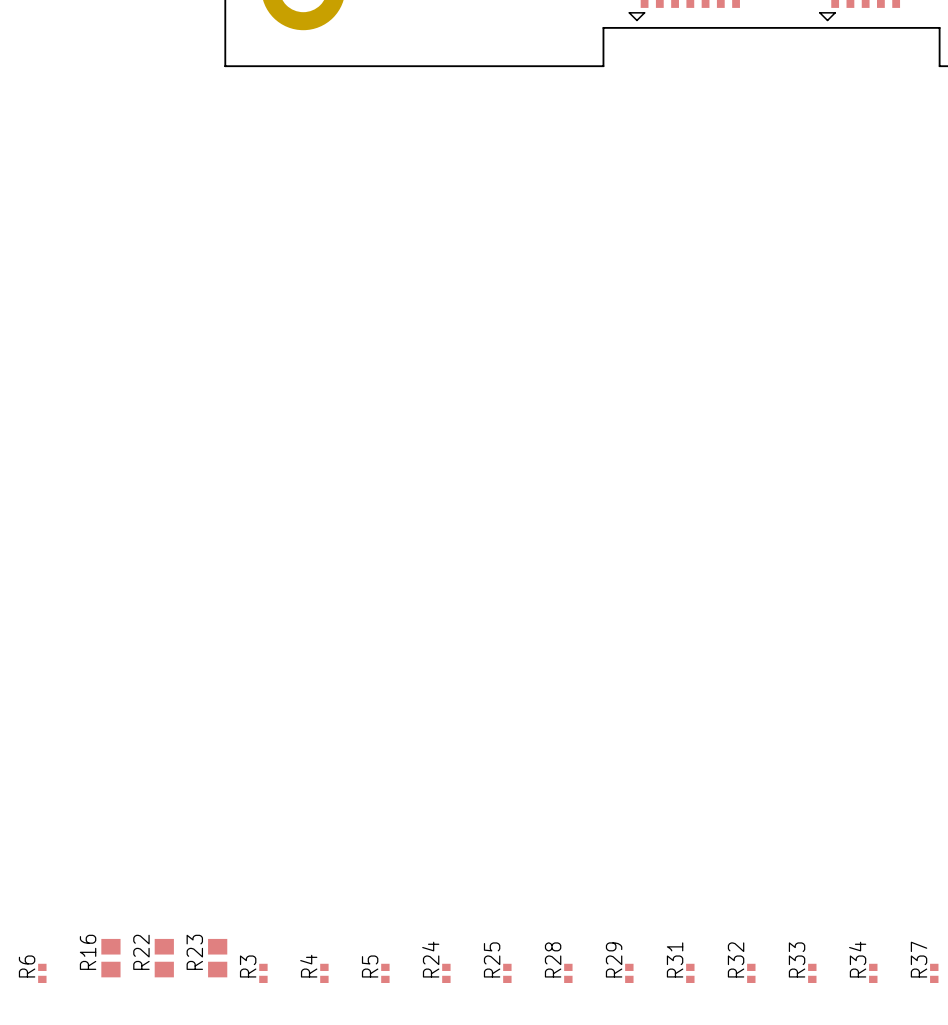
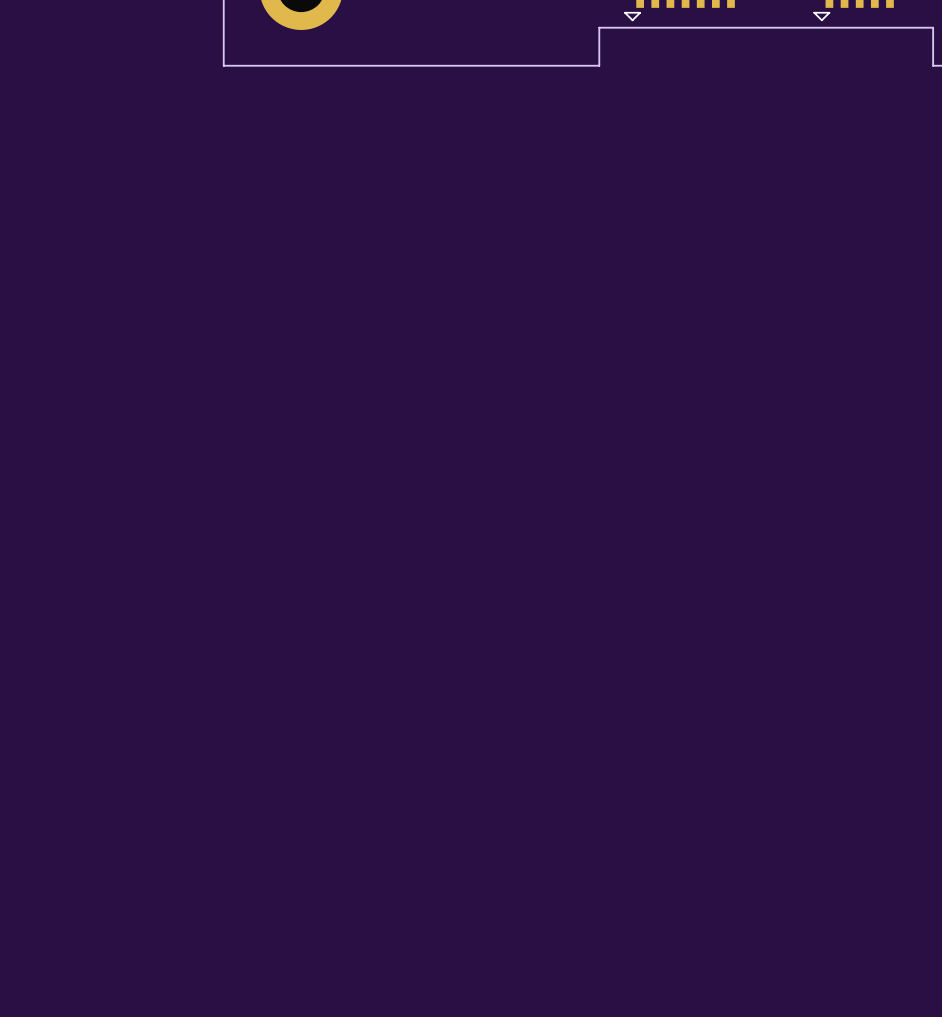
R16: (110, 958) -> none
R22: (164, 958) -> none
R23: (217, 958) -> none
R6: (42, 973) -> none
R3: (263, 973) -> none
R4: (324, 973) -> none
R5: (385, 973) -> none
R24: (446, 973) -> none
R25: (507, 973) -> none
R28: (568, 973) -> none
R29: (629, 973) -> none
R31: (690, 973) -> none
R32: (751, 973) -> none
R33: (812, 973) -> none
R34: (873, 973) -> none
R37: (934, 973) -> none

